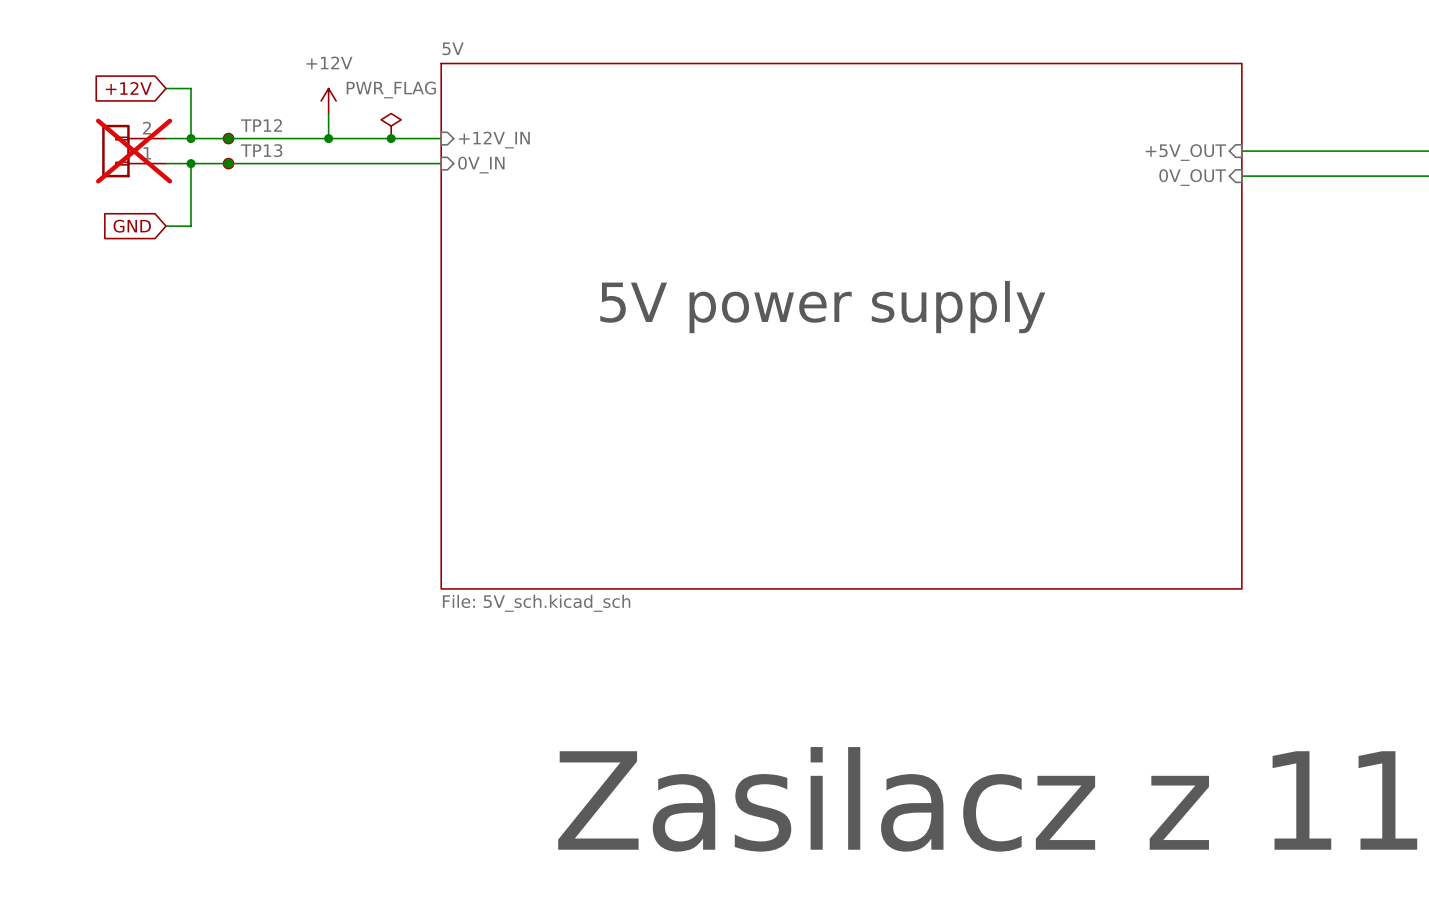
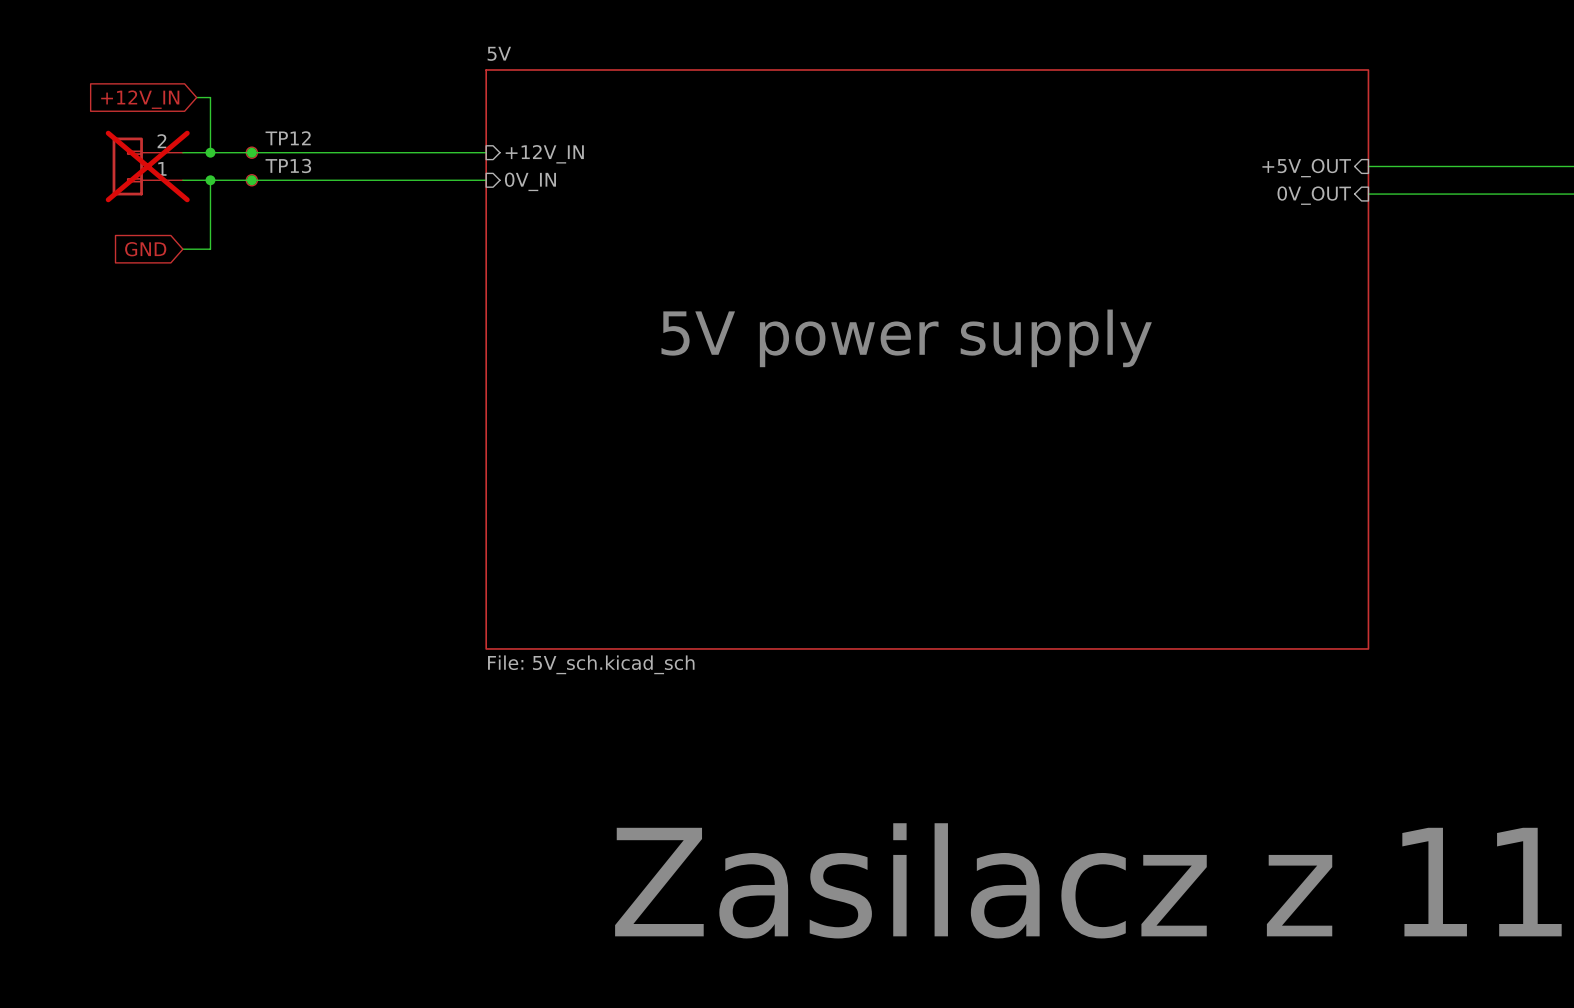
global label: +12V (128, 88) -> +12V_IN (140, 99)
wire: (165, 88) (178, 88) -> none
power symbol: +12V (328, 101) -> none
wire: (328, 113) (328, 138) -> none
power symbol: PWR_FLAG (391, 126) -> none
junction: (328, 138) -> none
junction: (391, 138) -> none

